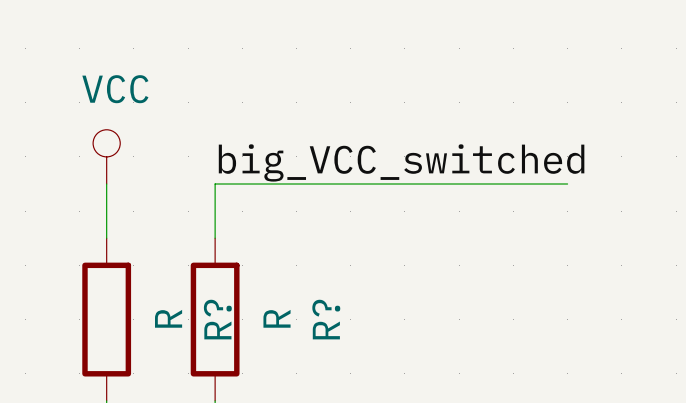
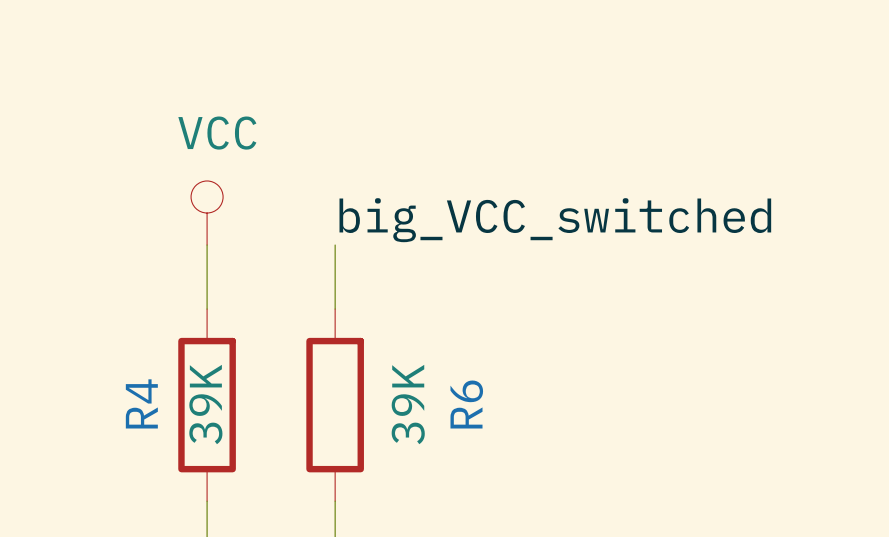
wire: (215, 184) (567, 184) -> none
R? value: R (168, 318) -> 39K (205, 404)
R? value: R (277, 318) -> 39K (408, 404)
R? name: R? (217, 319) -> R4 (141, 403)
R? name: R? (326, 319) -> R6 (466, 404)

